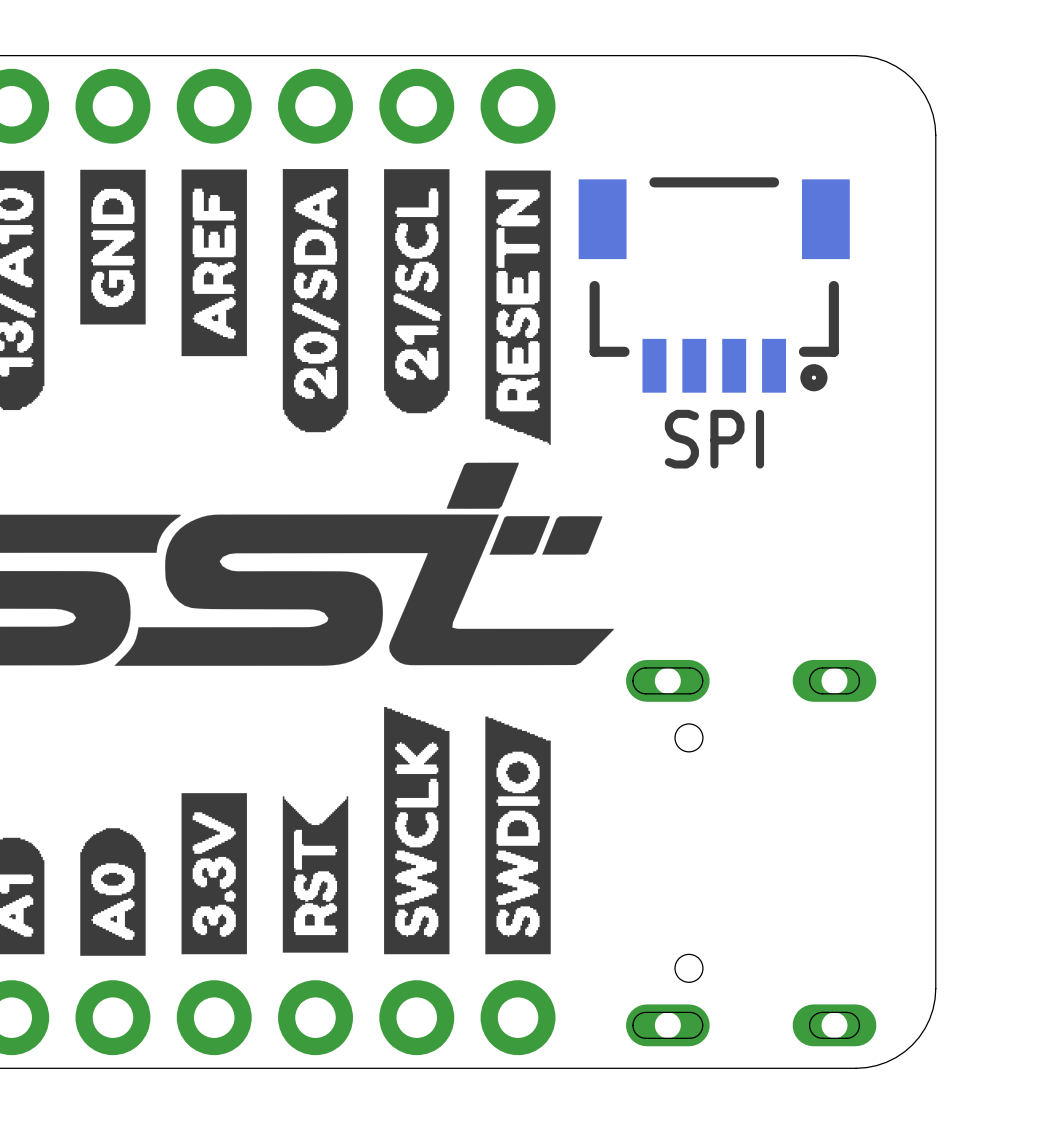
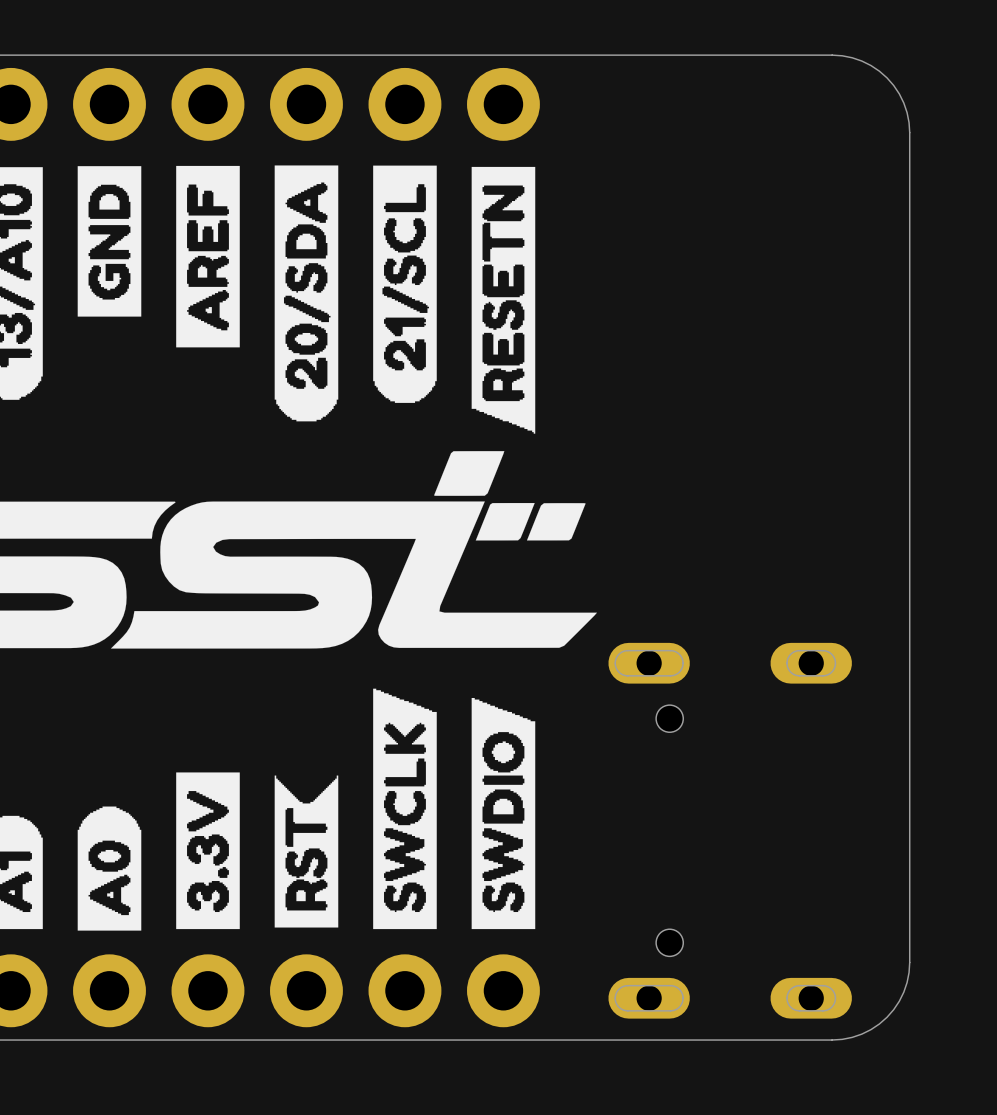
SPI: (714, 284) -> none

